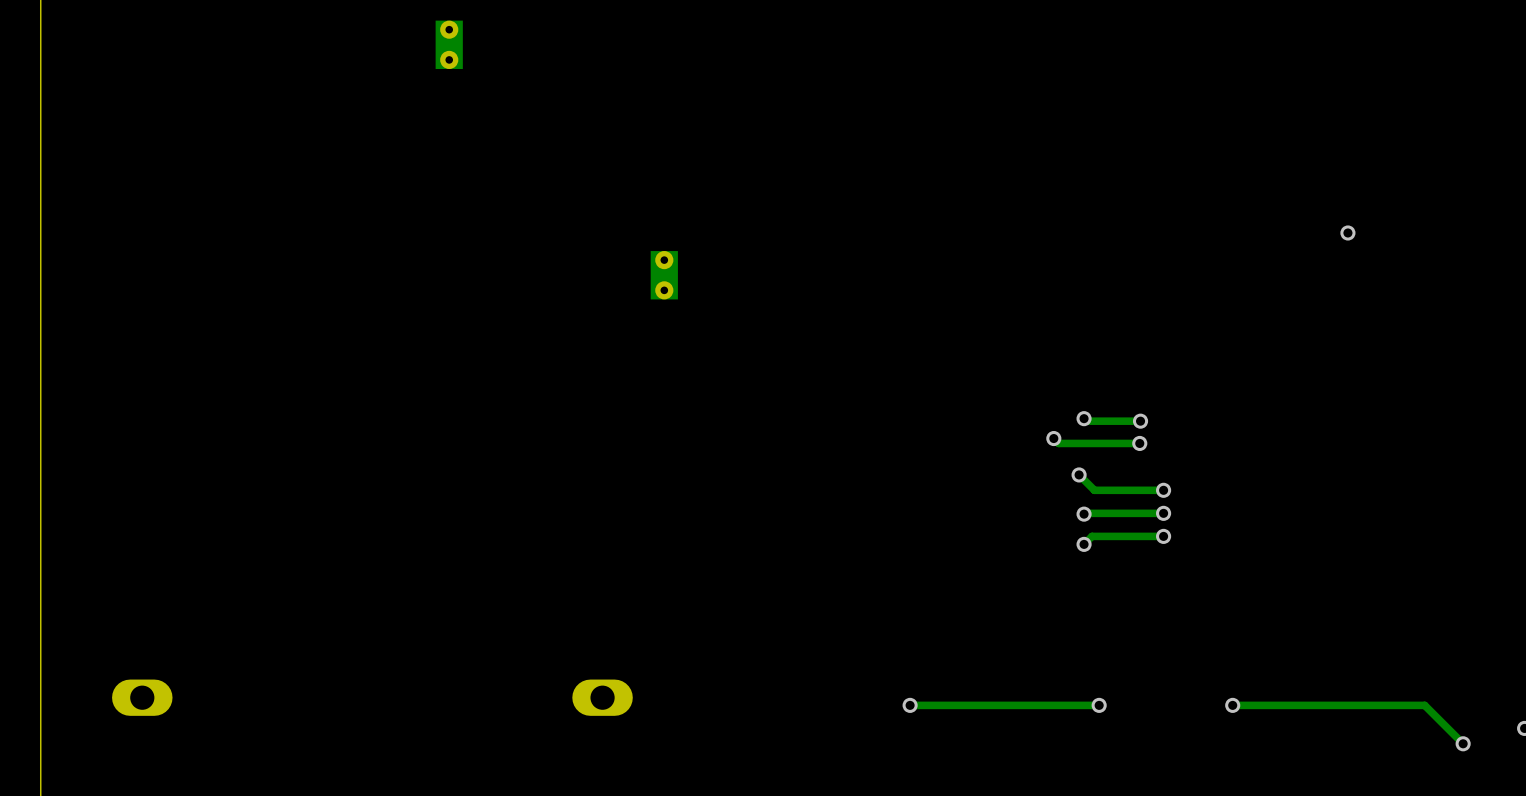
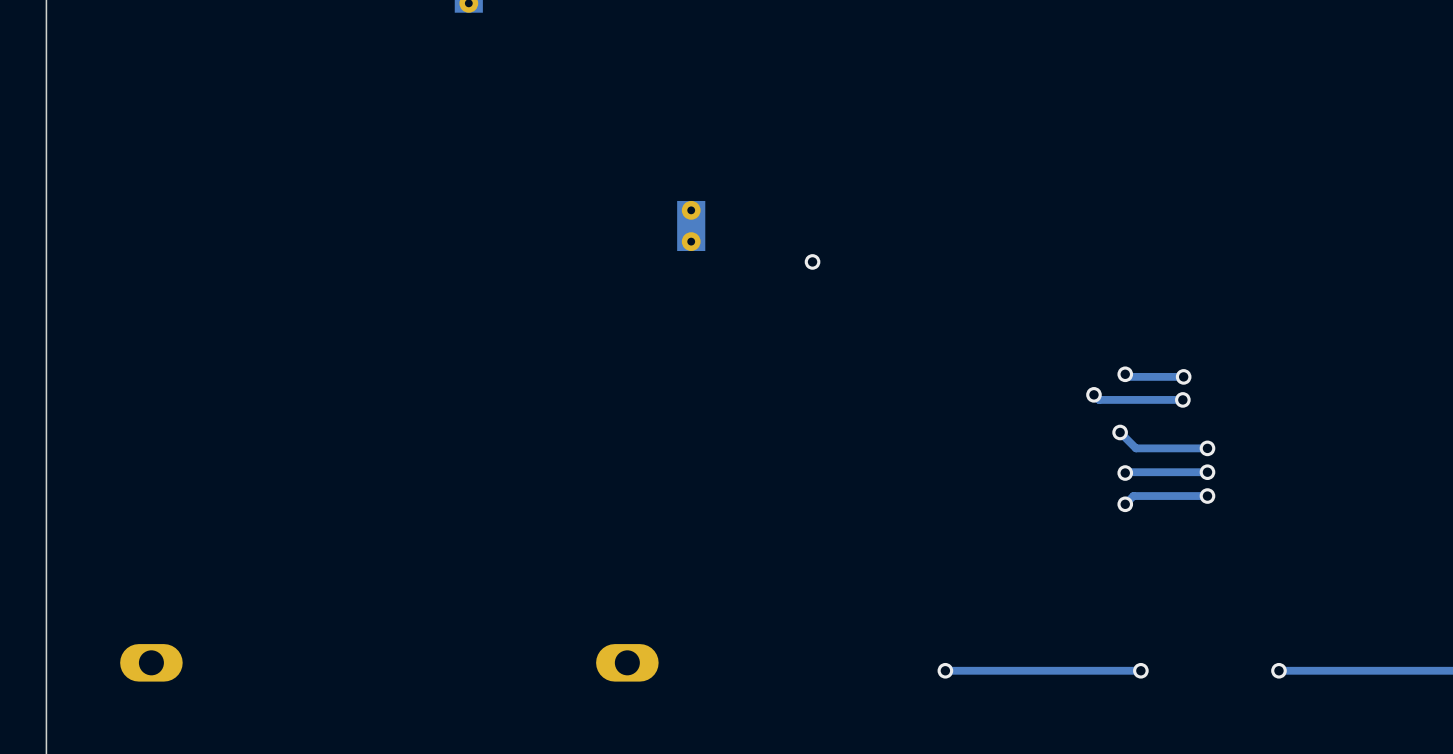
via: (1347, 232) -> none
via: none -> (812, 261)

